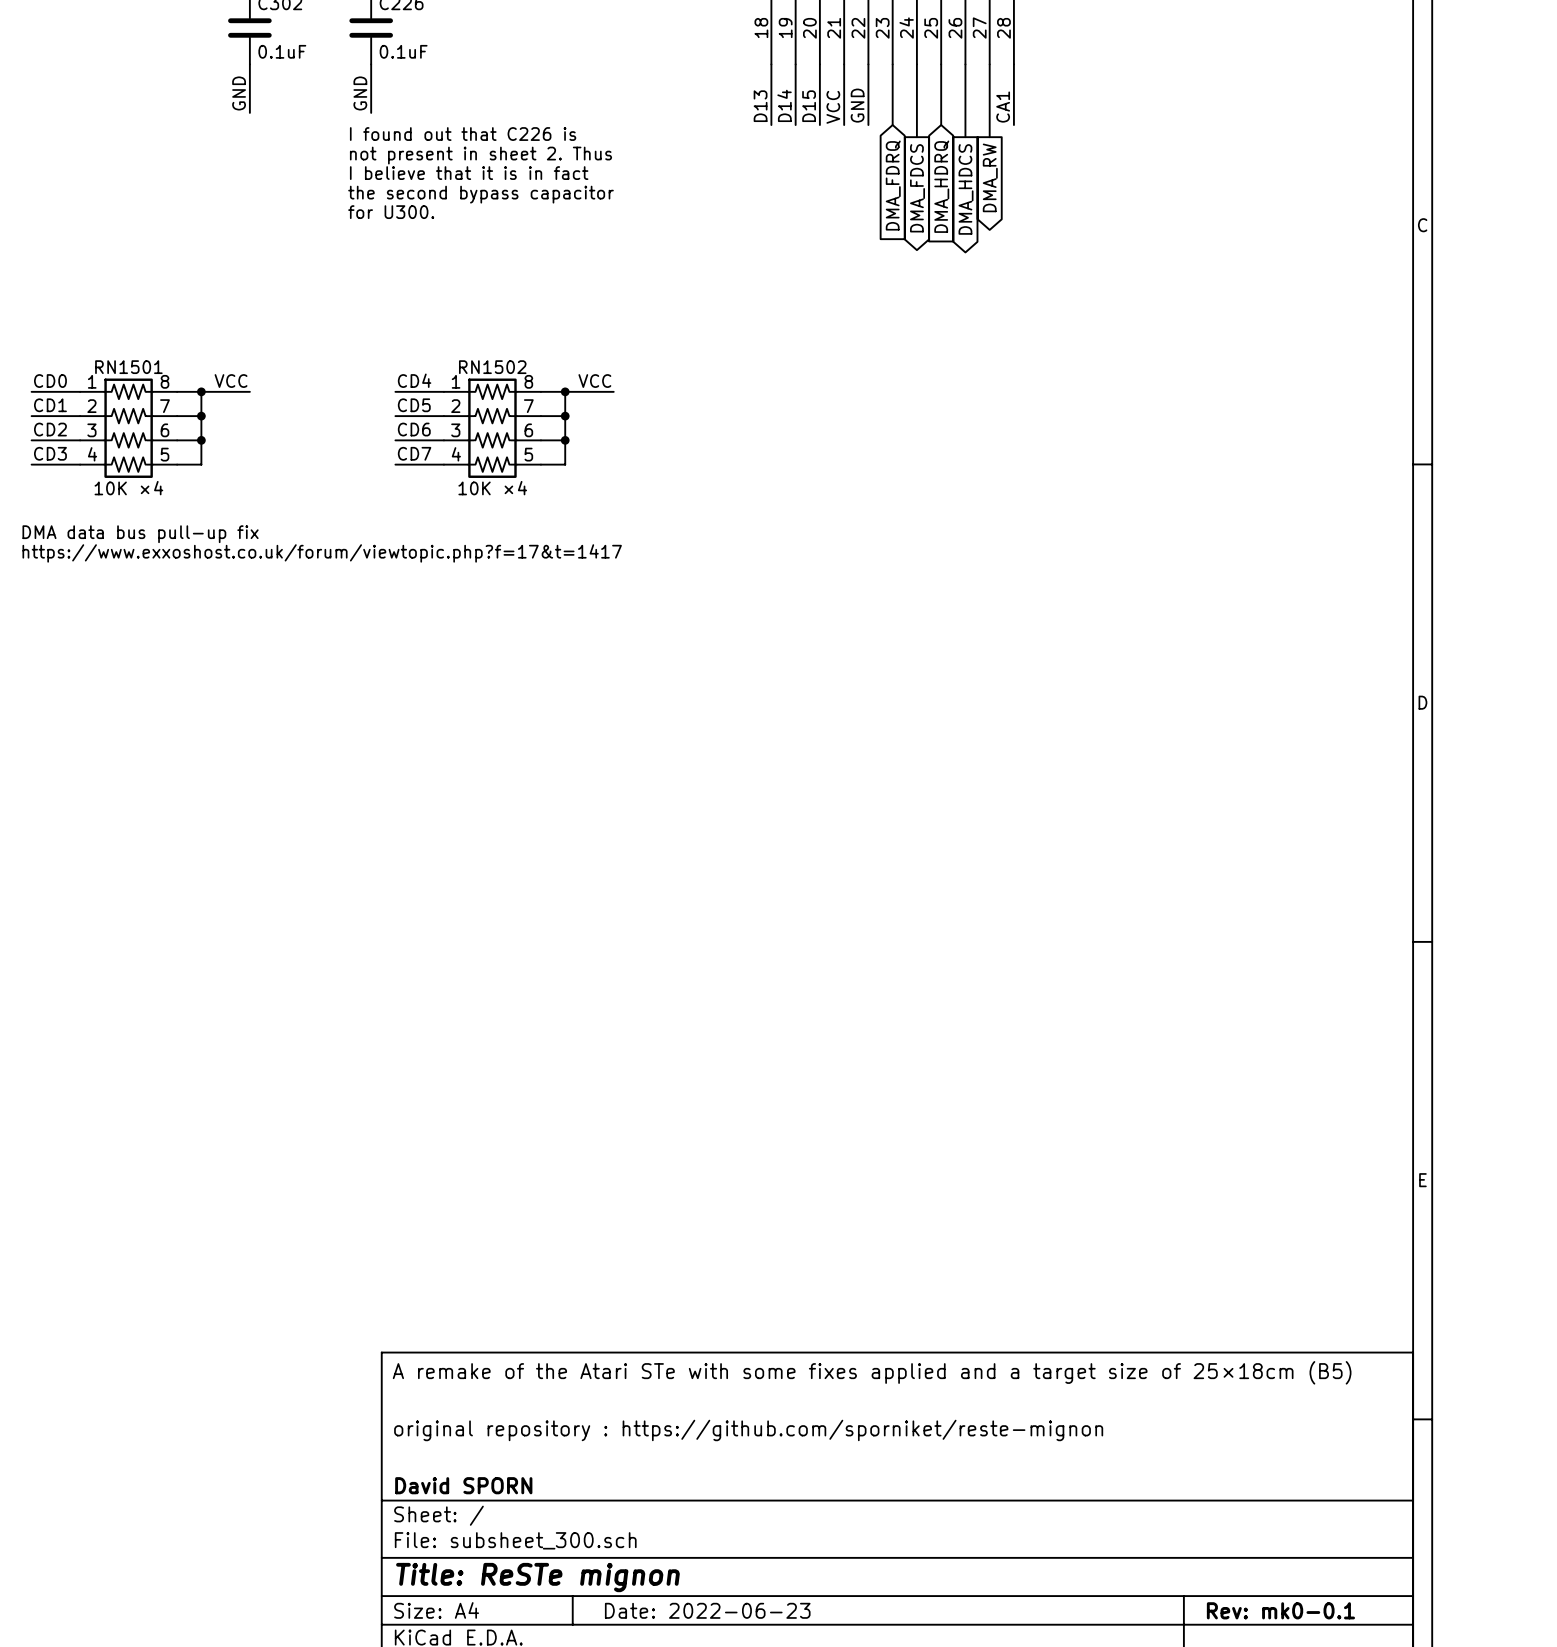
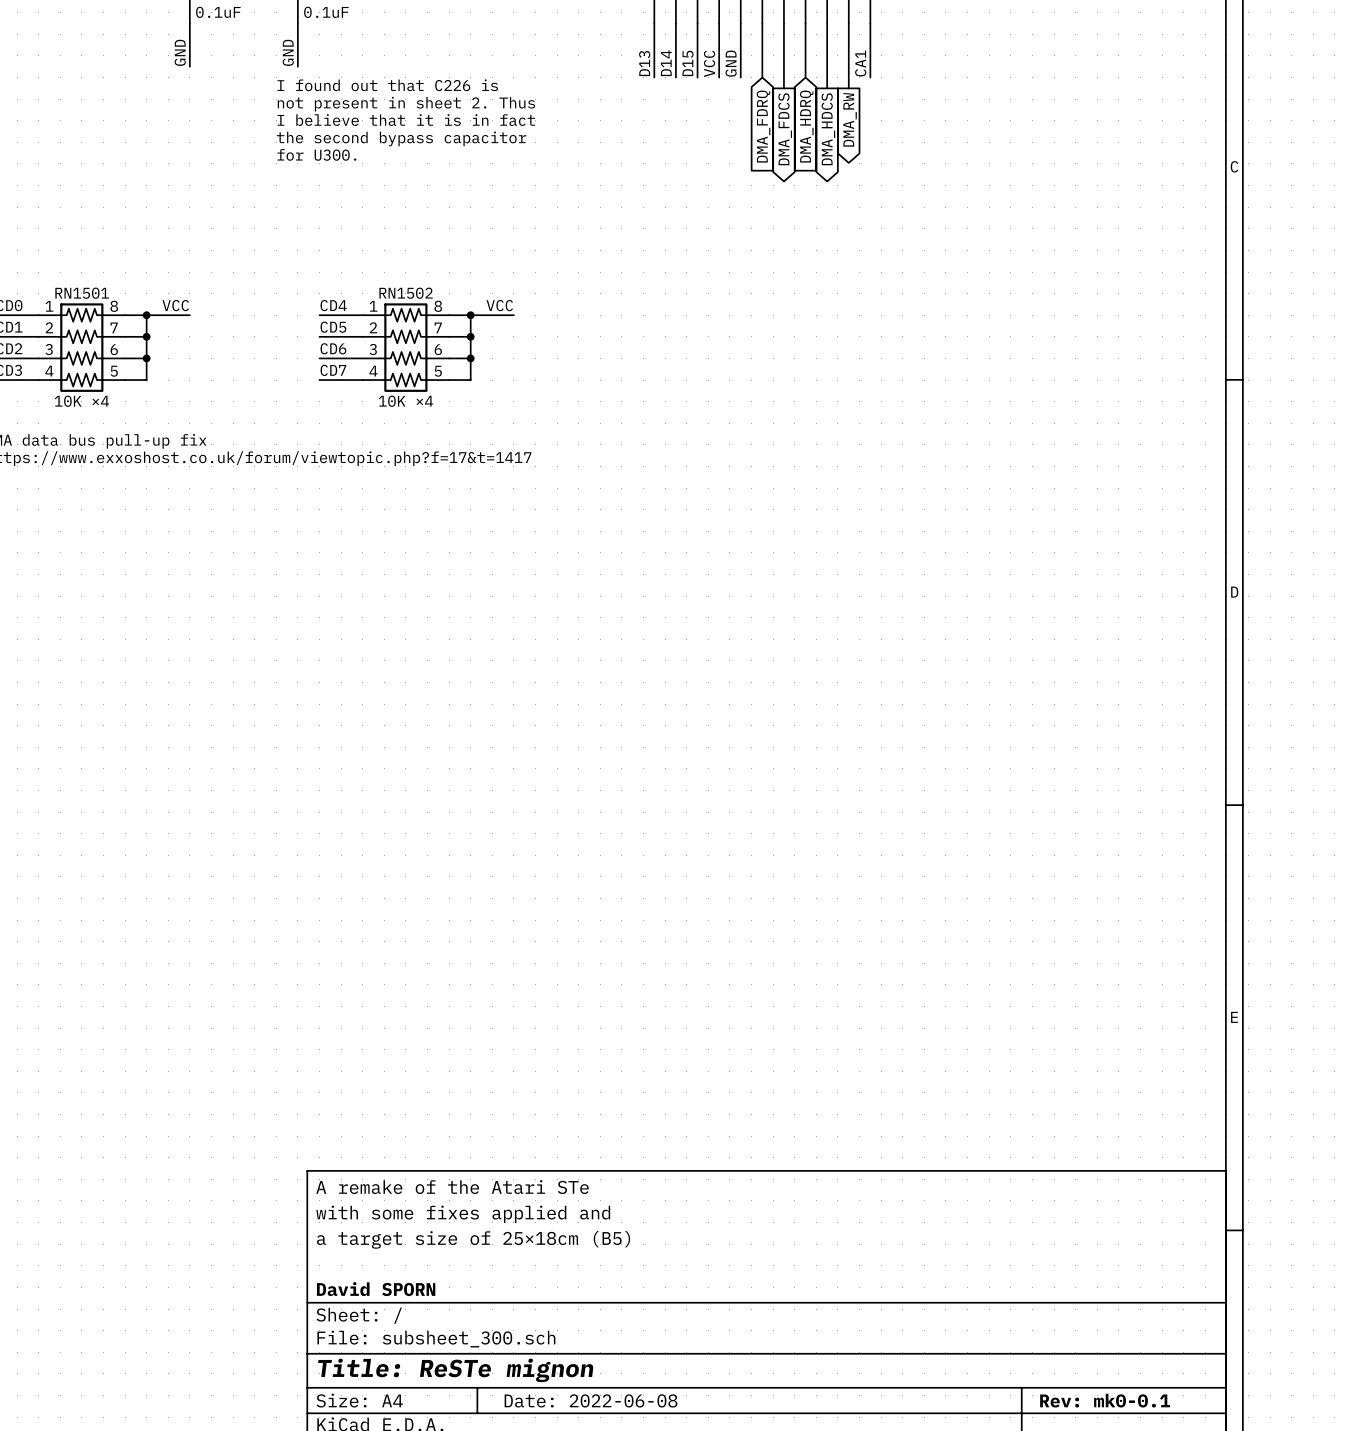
title block: A remake of the Atari STe with some fixes applied and a target size of 25×18cm (B5) (872, 1372) -> A remake of the Atari STe (452, 1187)
title block: none -> with some fixes applied and (463, 1214)
title block: original repository : https://github.com/sporniket/reste-mignon (748, 1430) -> a target size of 25×18cm (B5) (473, 1239)
title block: Date: 2022-06-23 (707, 1610) -> Date: 2022-06-08 (591, 1400)

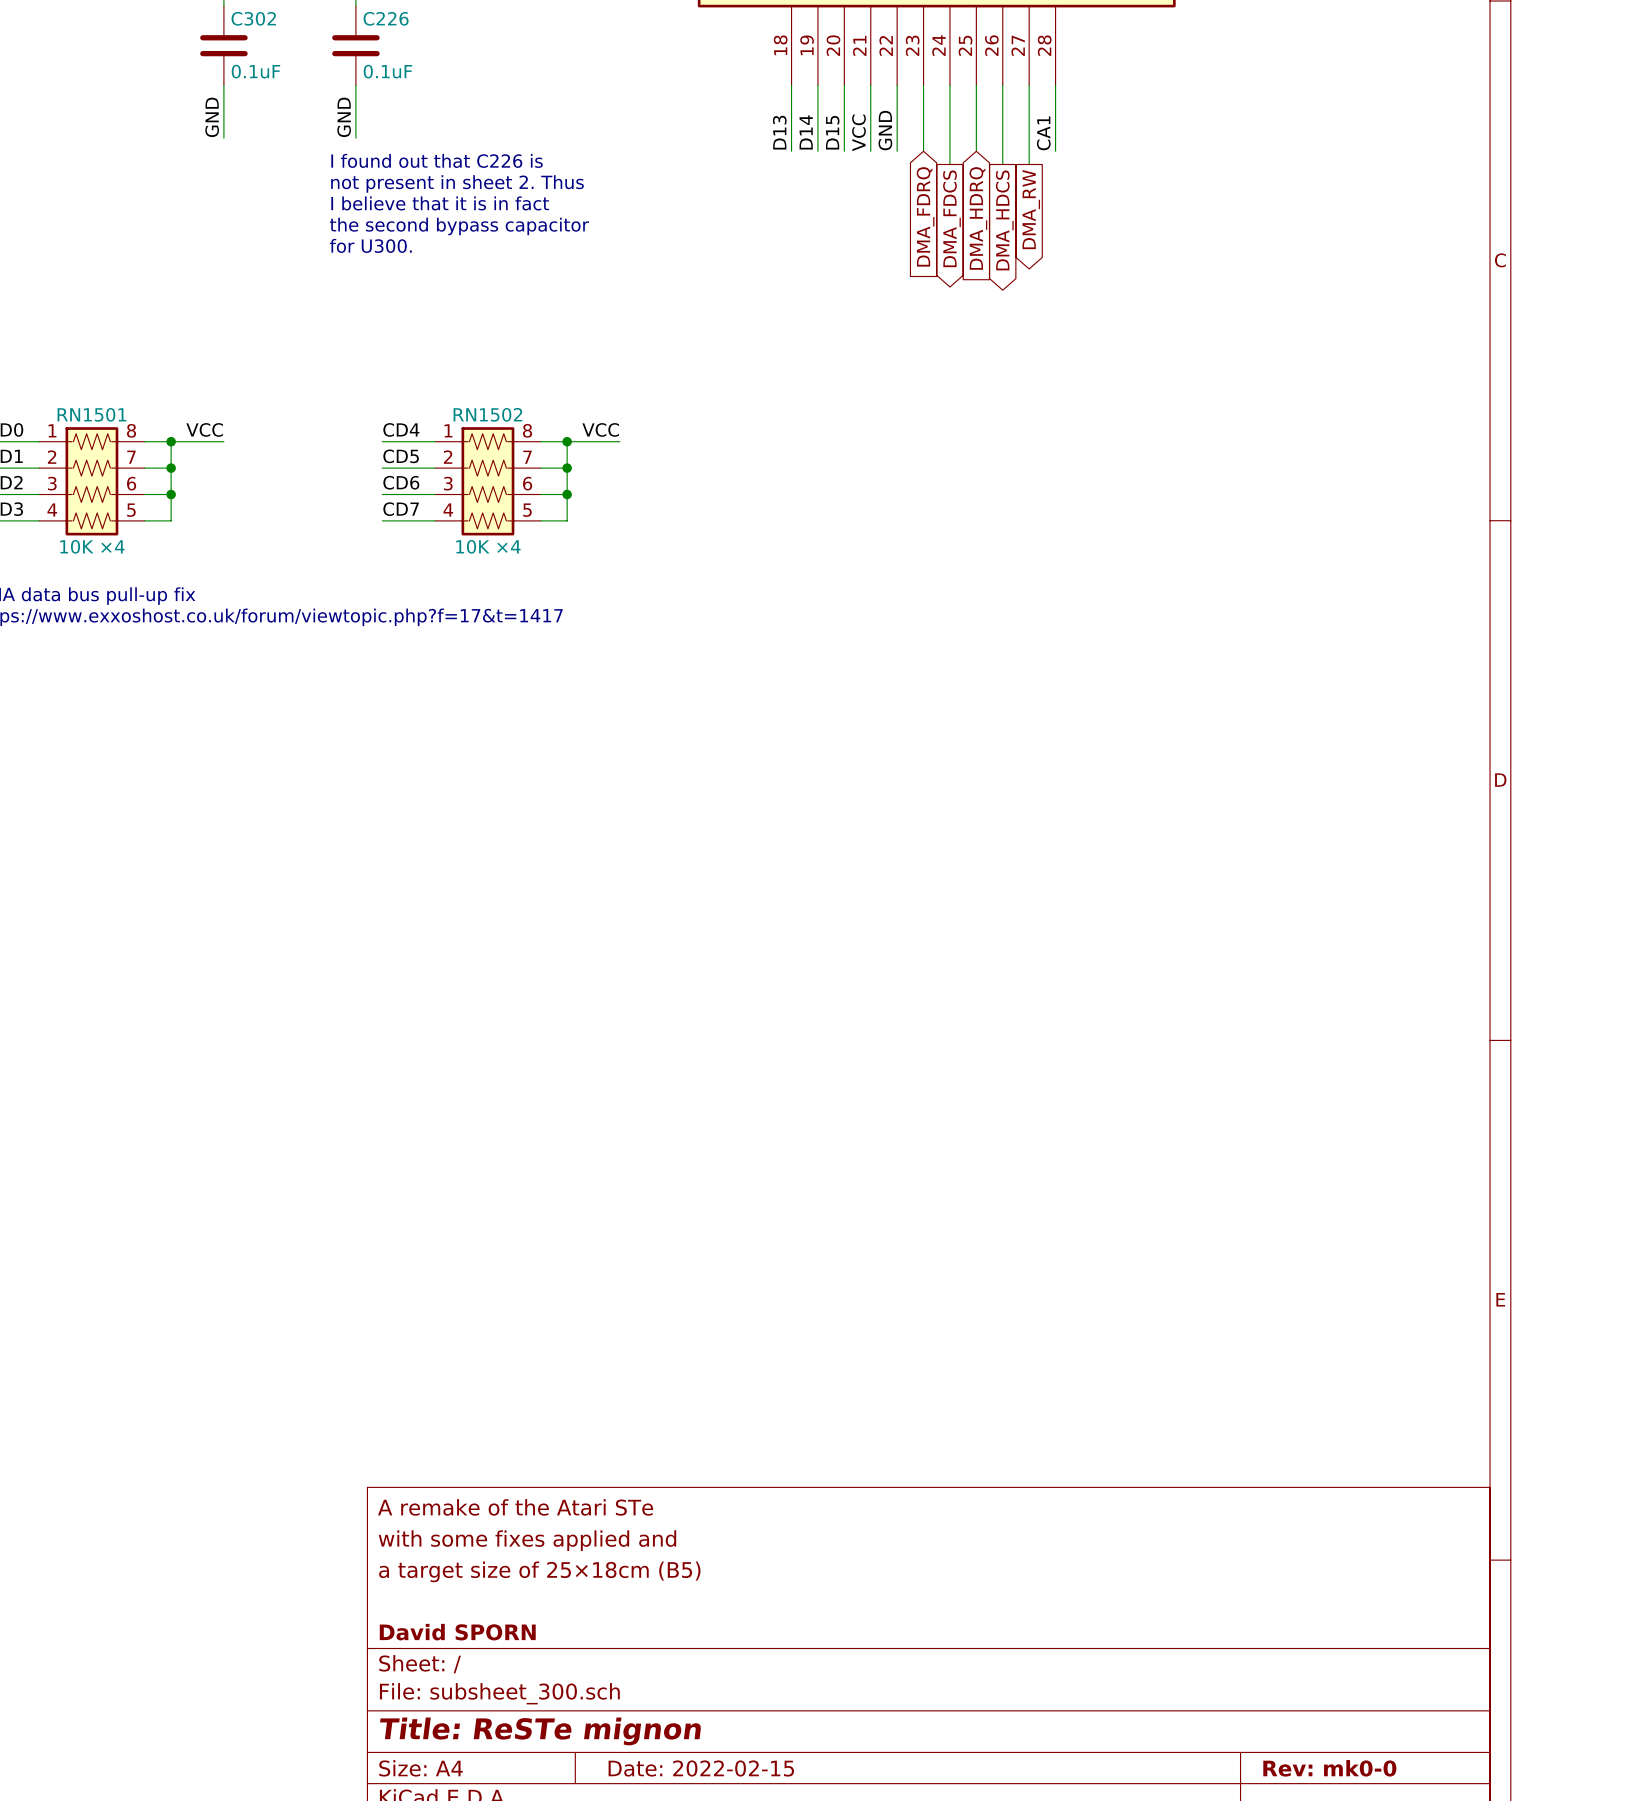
title block: Date: 2022-06-08 (591, 1400) -> Date: 2022-02-15 (701, 1768)
title block: Rev: mk0-0.1 (1105, 1400) -> Rev: mk0-0 (1329, 1768)

